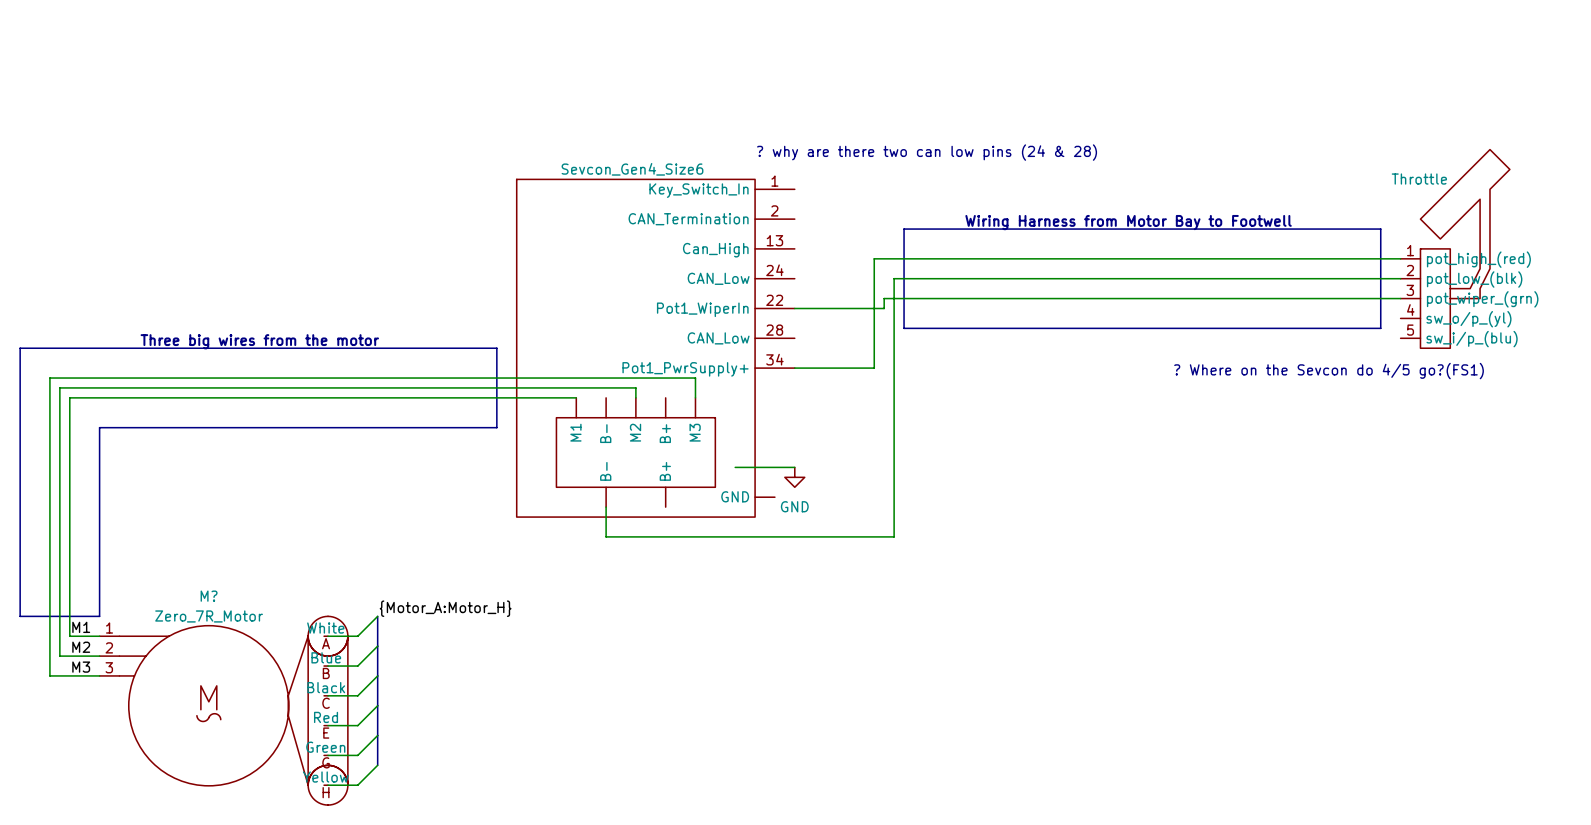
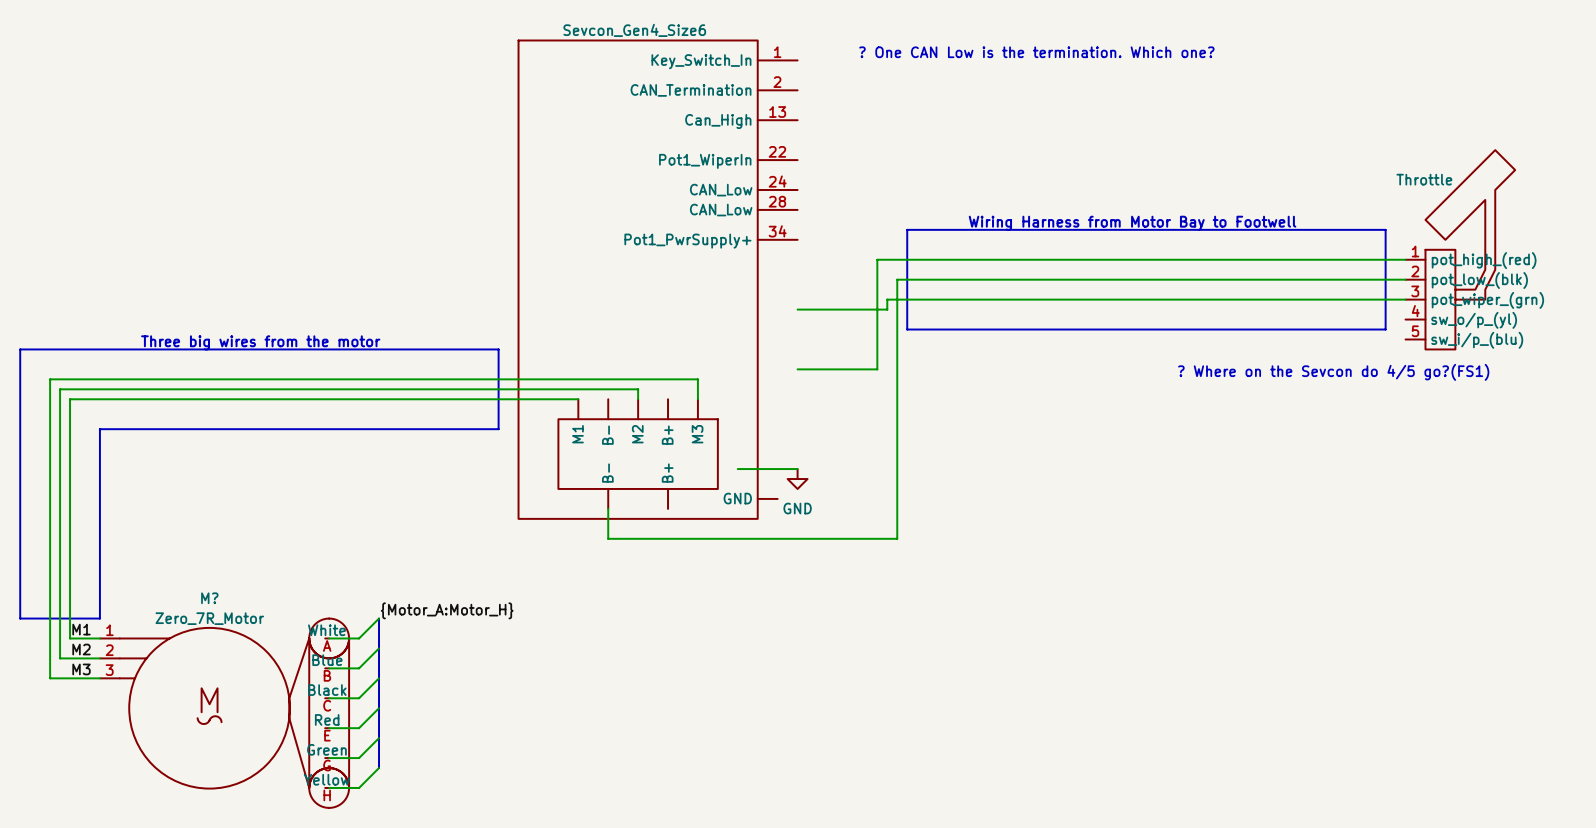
text: none -> ? One CAN Low is the termination. Which one? (1036, 52)
text: ? why are there two can low pins (24 & 28) (927, 152) -> none
part: none -> Sevcon_Gen4_Size6 (658, 279)
part: Sevcon_Gen4_Size6 (655, 348) -> none

